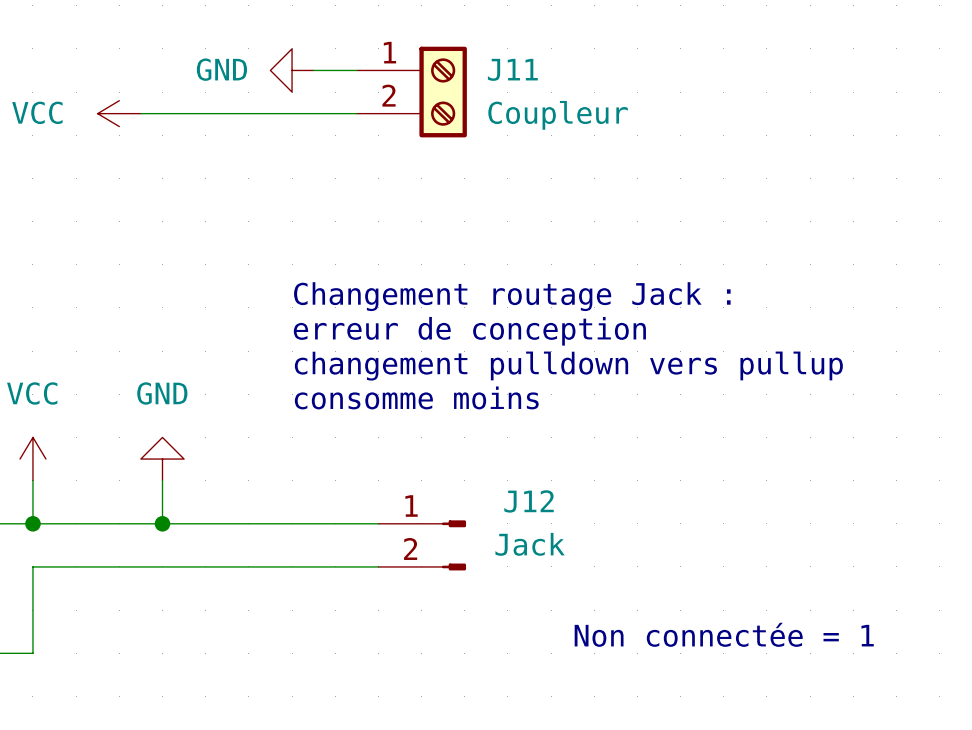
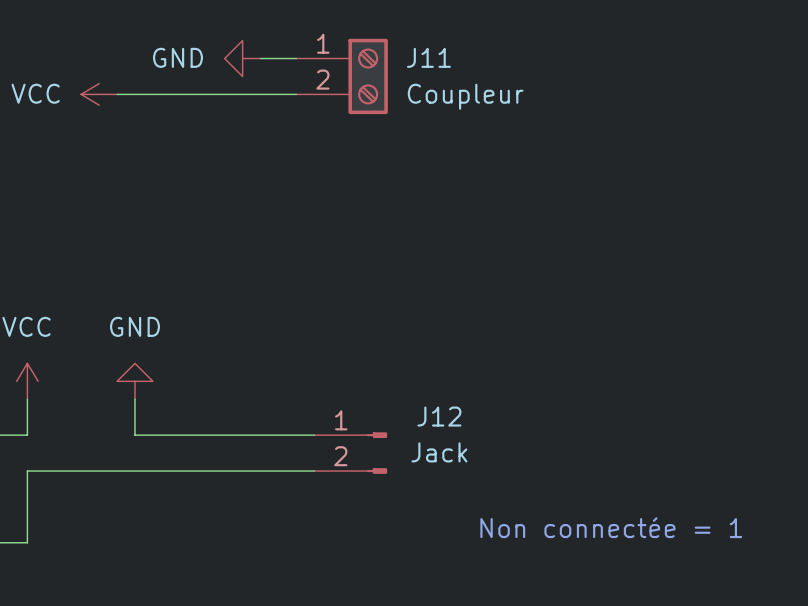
text: Changement routage Jack : (512, 296) -> none
text: erreur de conception (469, 331) -> none
text: changement pulldown vers pullup (568, 366) -> none
text: consomme moins (416, 397) -> none
wire: (32, 523) (162, 523) -> none
junction: (32, 523) -> none
junction: (162, 523) -> none

